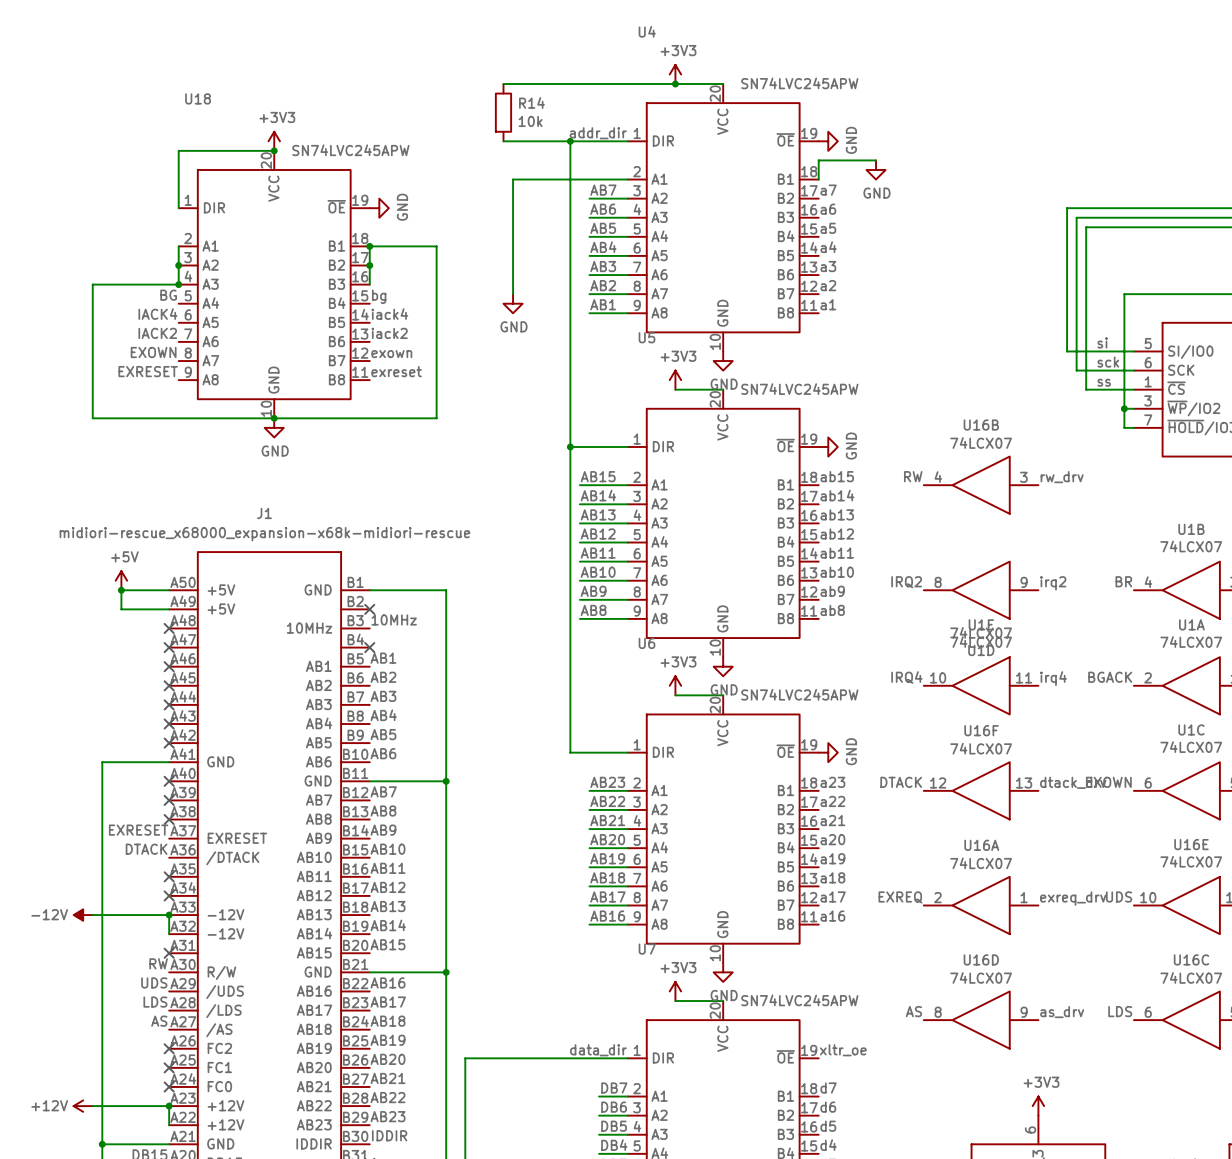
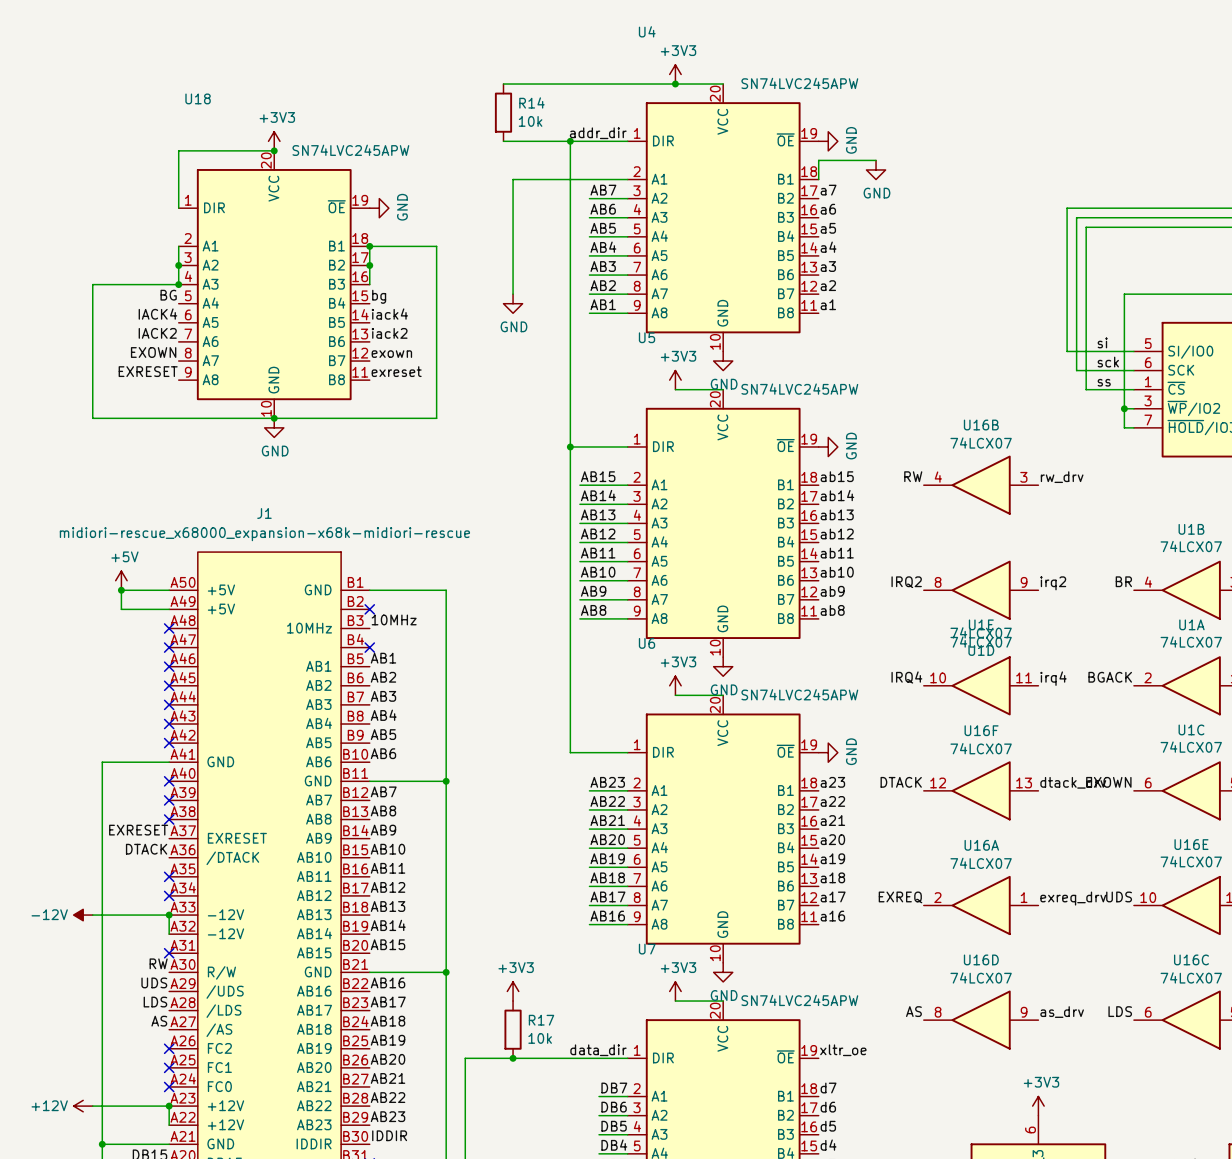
power symbol: none -> +3V3 (513, 991)
R17: none -> 10k (513, 1029)
junction: none -> (513, 1058)

